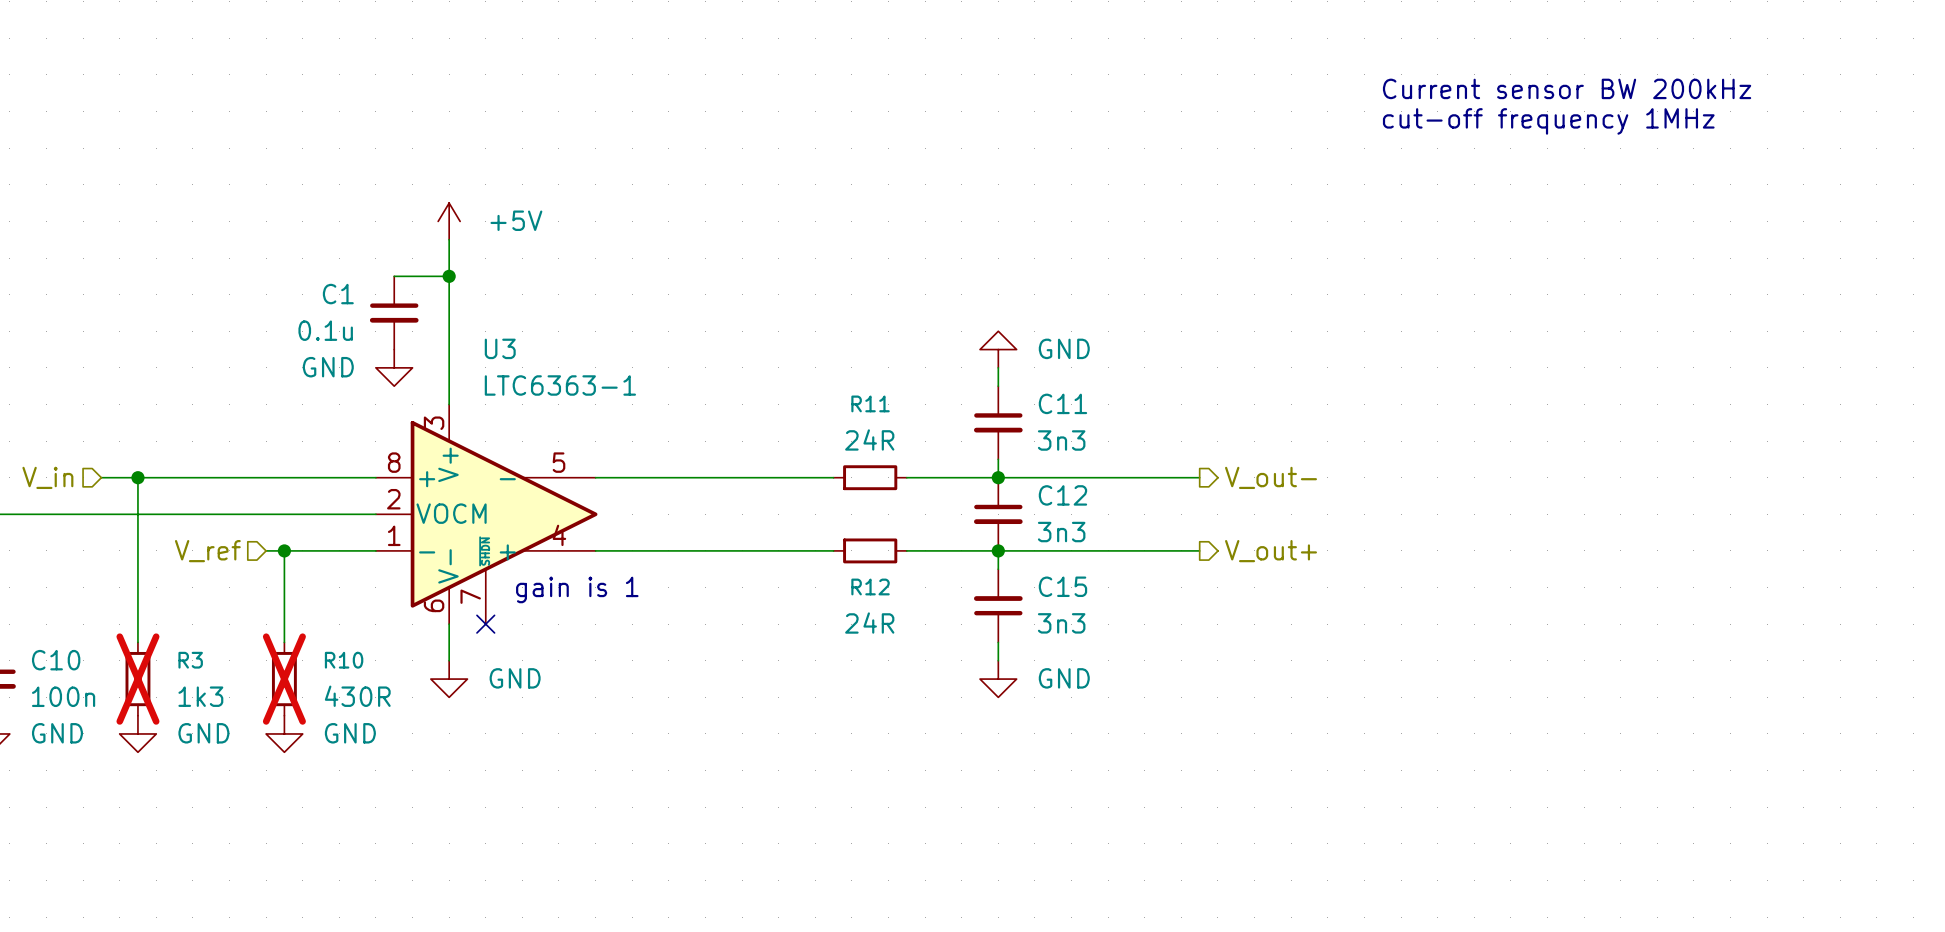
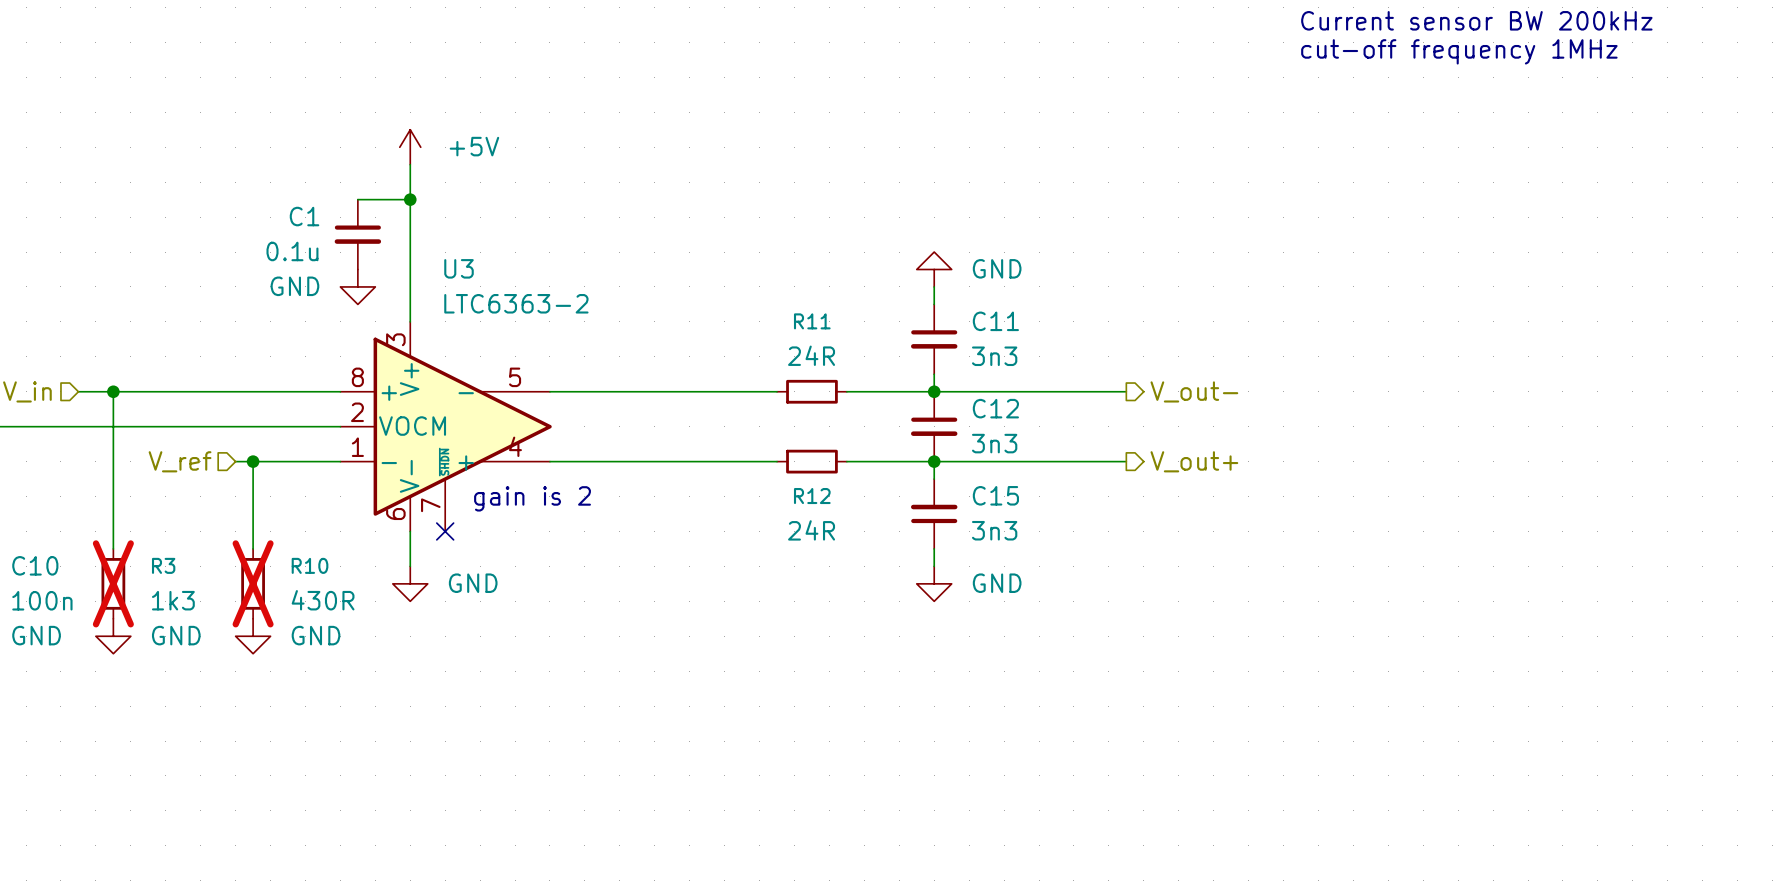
U3 value: LTC6363-1 (560, 385) -> LTC6363-2 (516, 303)
text: gain is 1 (577, 589) -> gain is 2 (532, 498)

